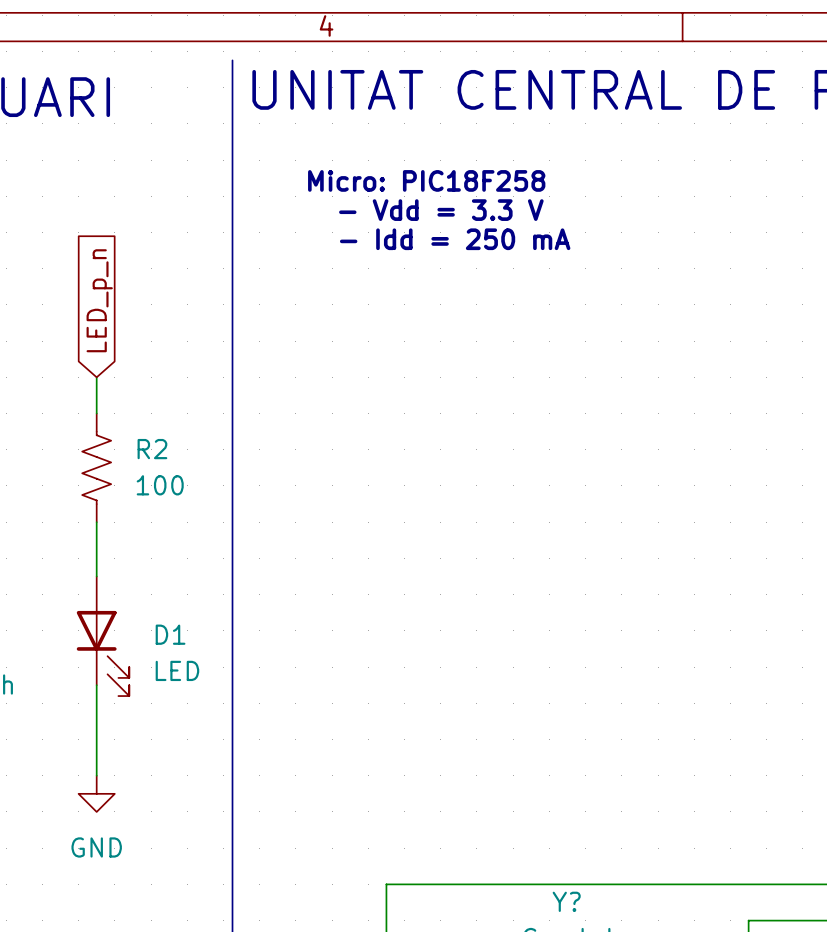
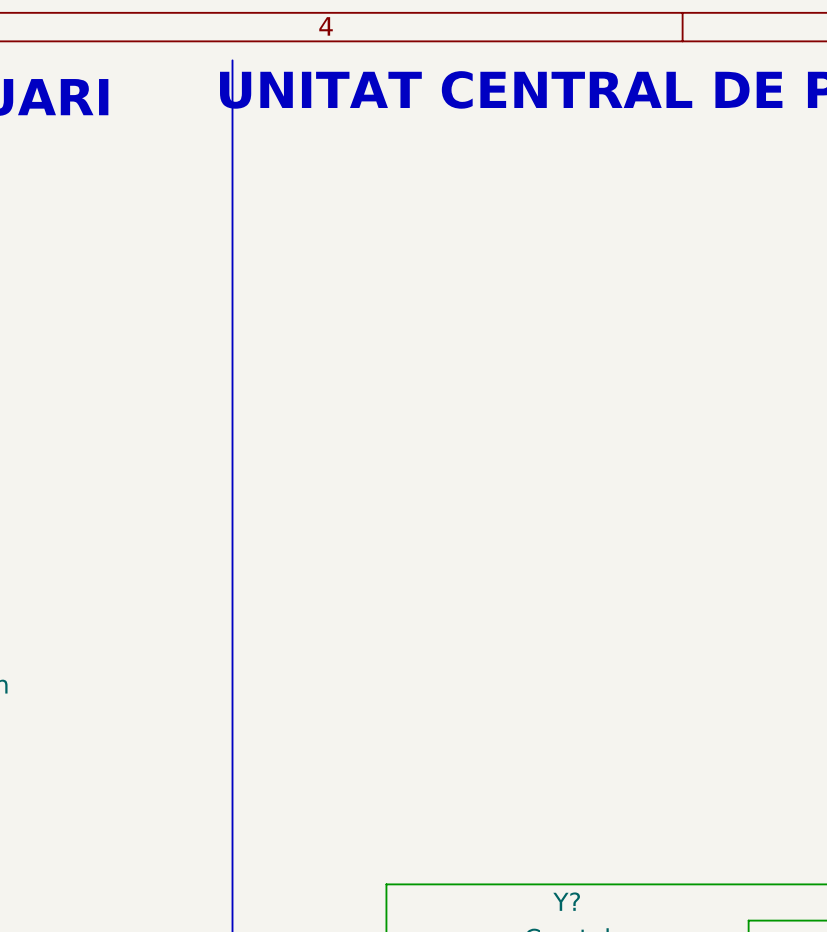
text: Micro: PIC18F258 (426, 180) -> none
text: - Vdd = 3.3 V (441, 210) -> none
text: - Idd = 250 mA (455, 239) -> none
global label: LED_p_n (99, 300) -> none
wire: (96, 377) (96, 413) -> none
R2: 100 (96, 467) -> none
wire: (96, 522) (96, 576) -> none
D1: LED (103, 636) -> none
wire: (96, 685) (96, 775) -> none
power symbol: GND (96, 793) -> none

